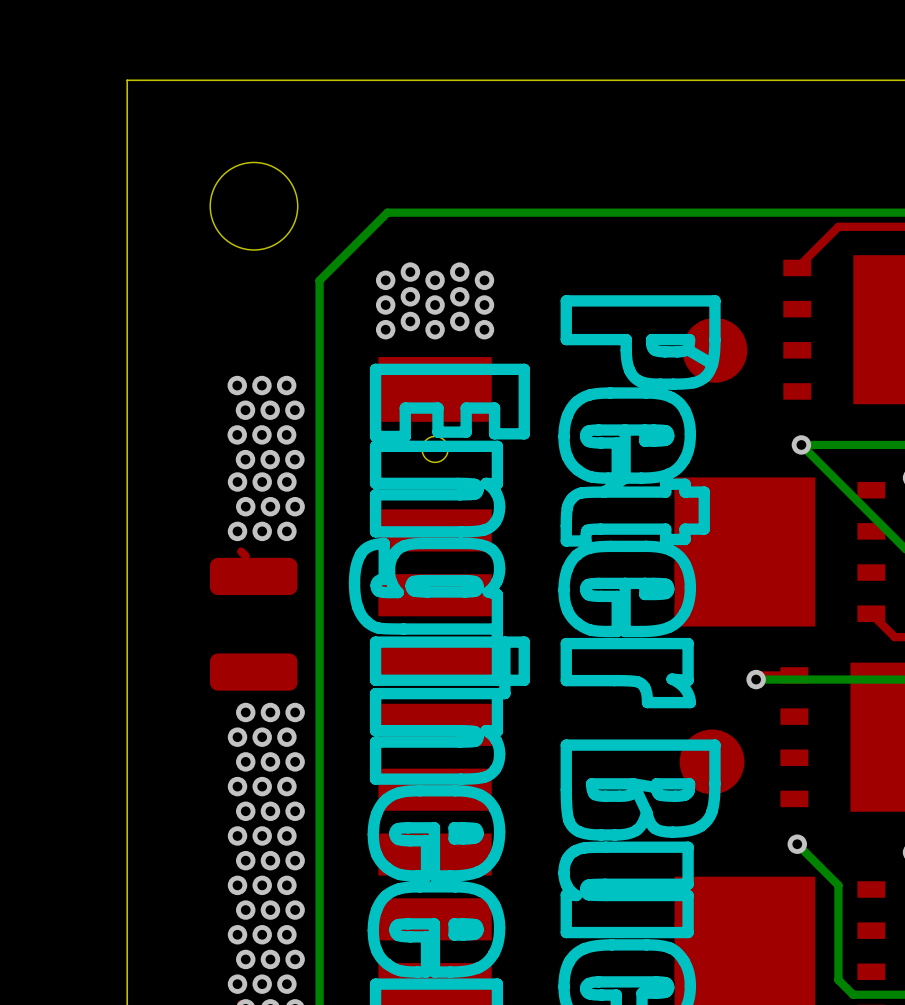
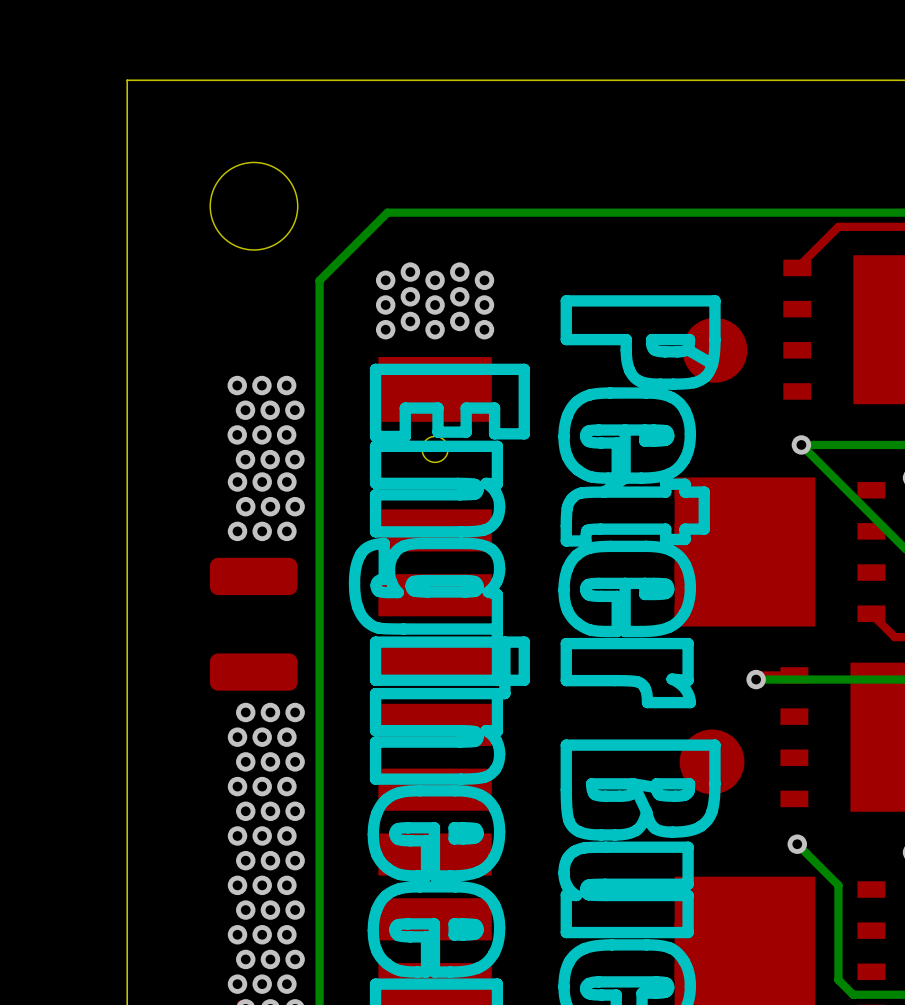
top track: (241, 551) (245, 556) -> none

